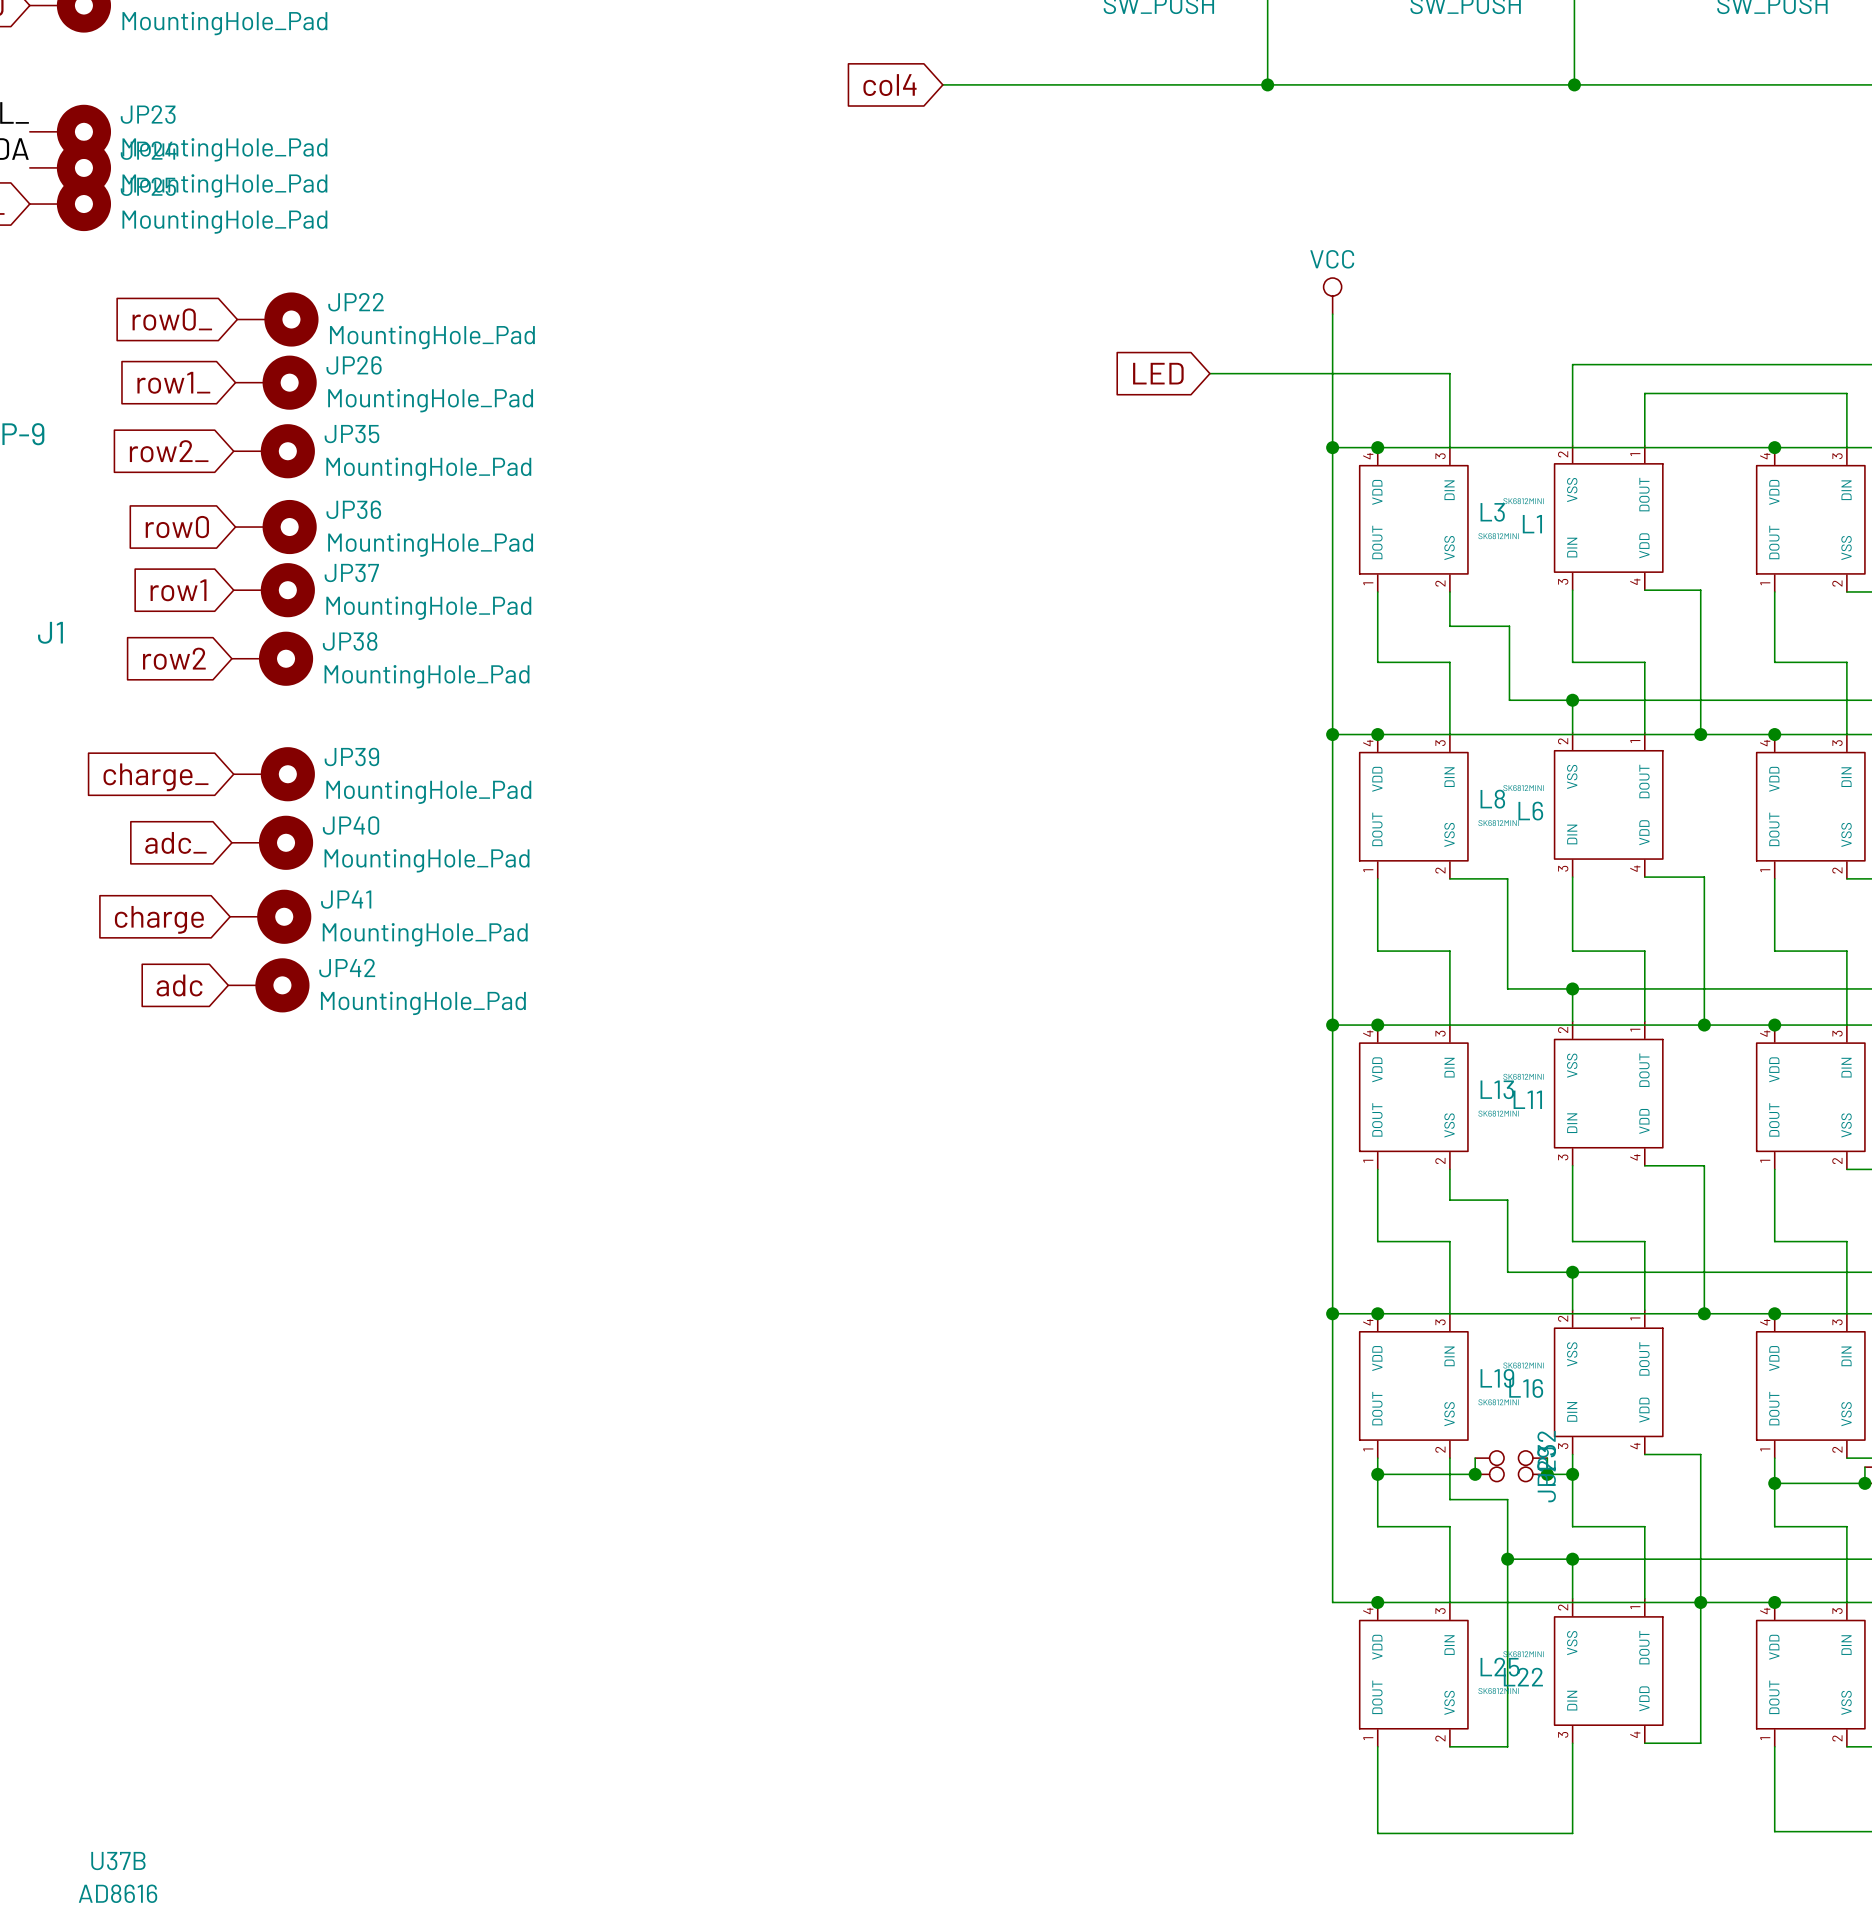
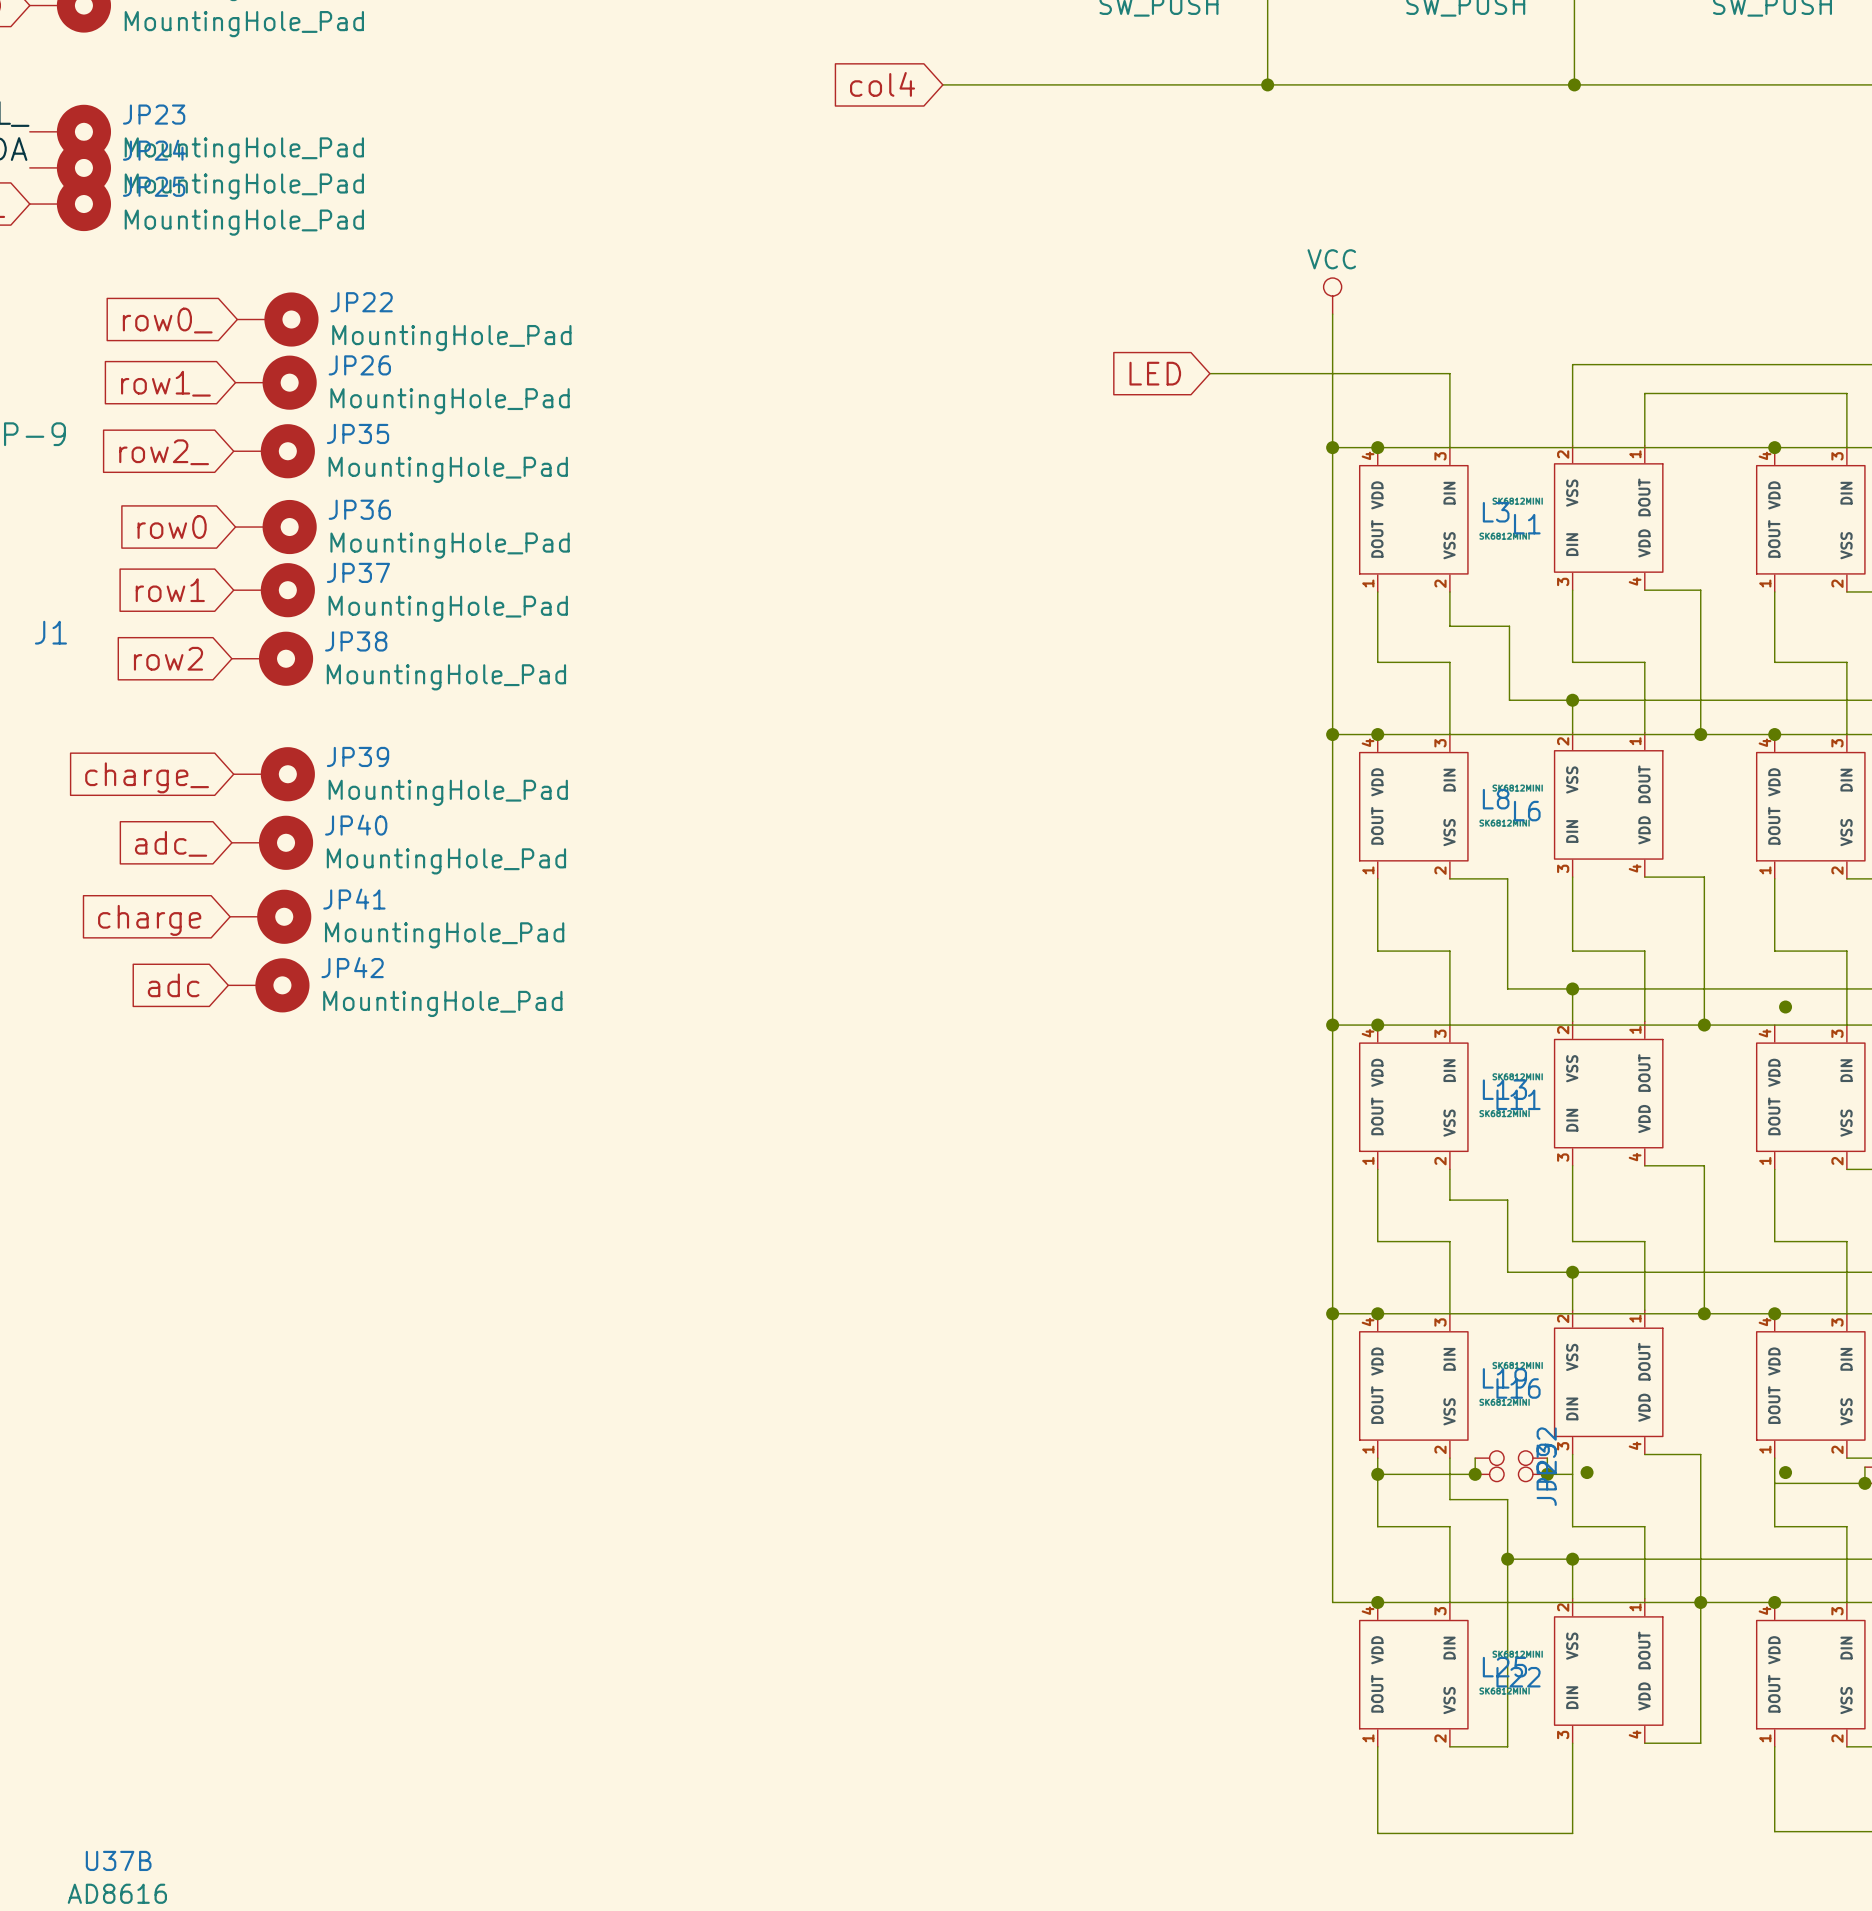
junction position: (1774, 1025) -> (1785, 1007)
junction position: (1572, 1474) -> (1587, 1472)
junction position: (1774, 1483) -> (1785, 1472)

